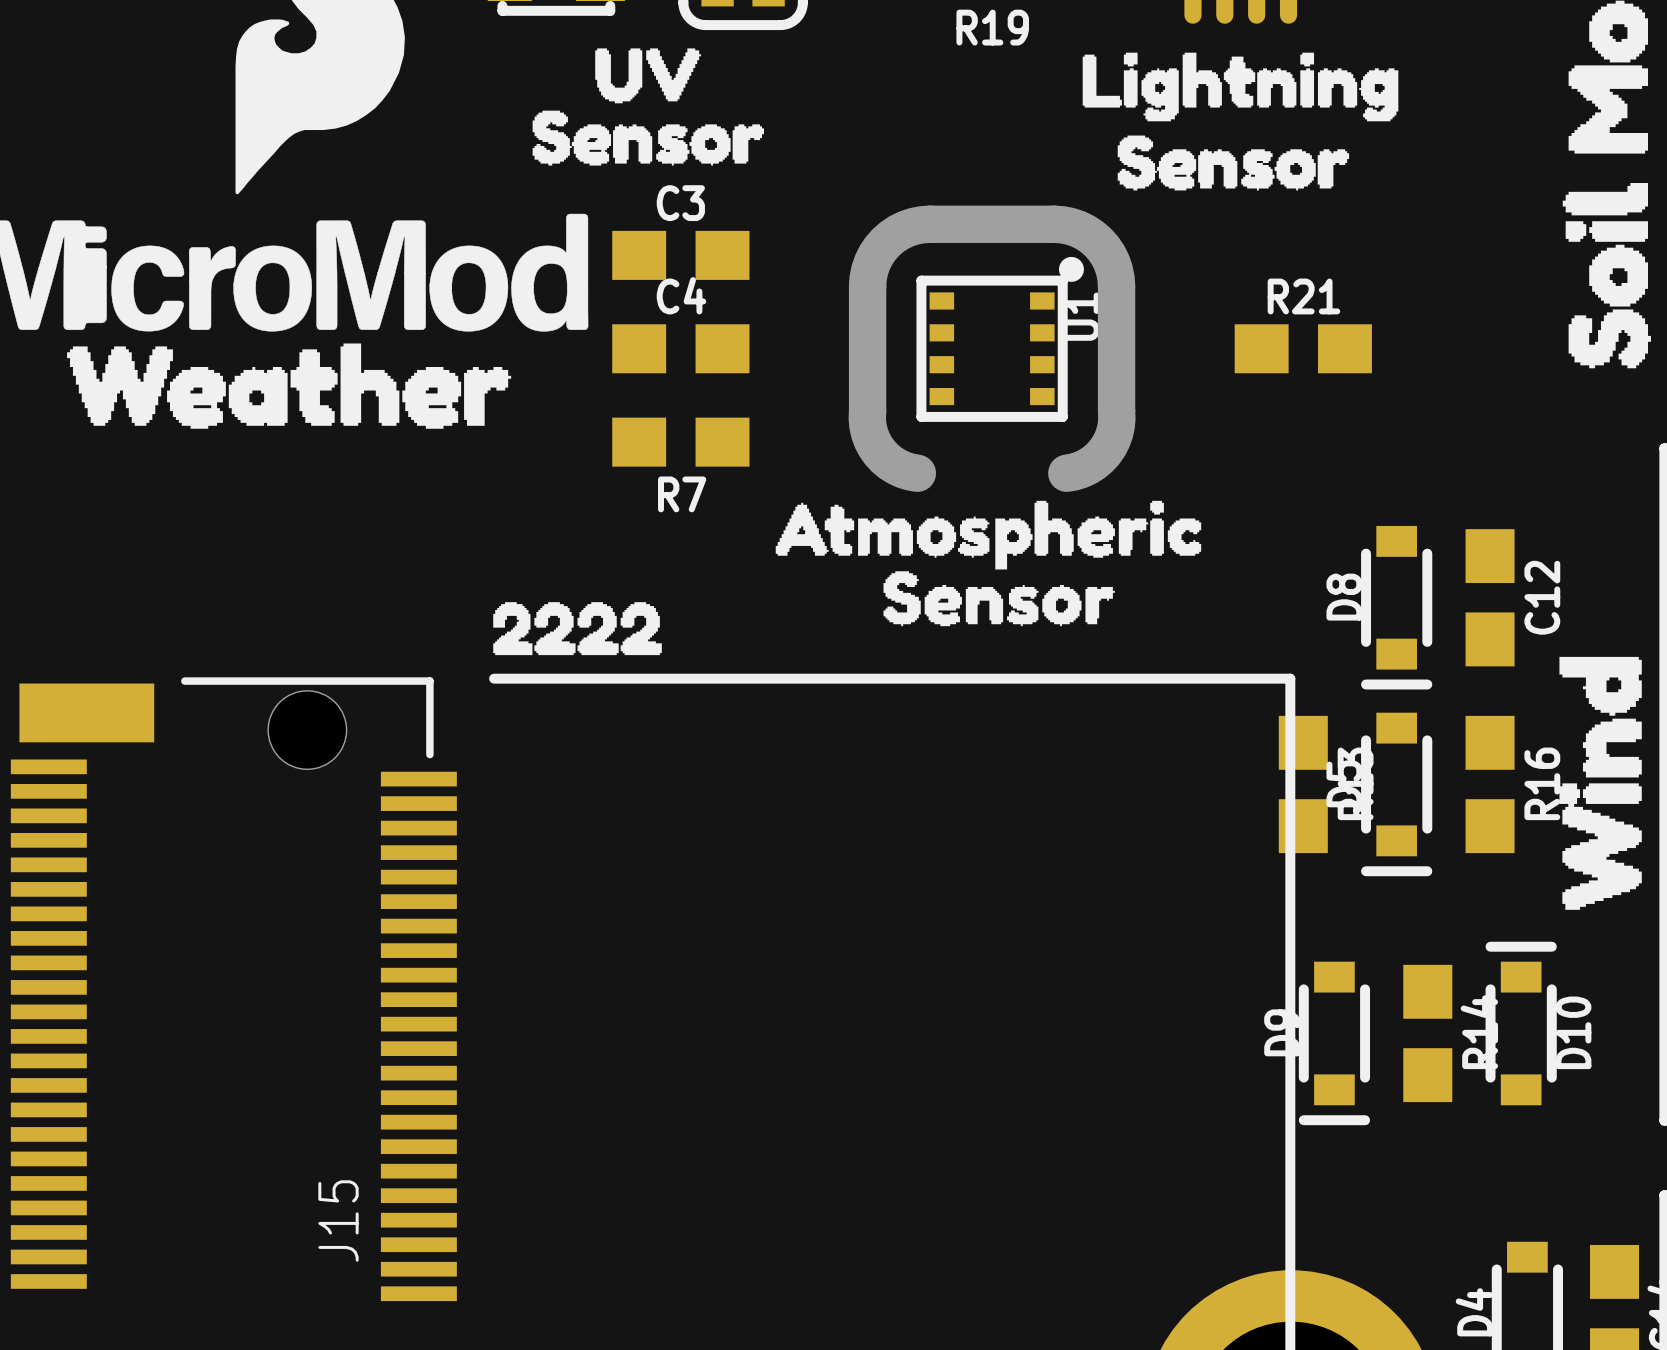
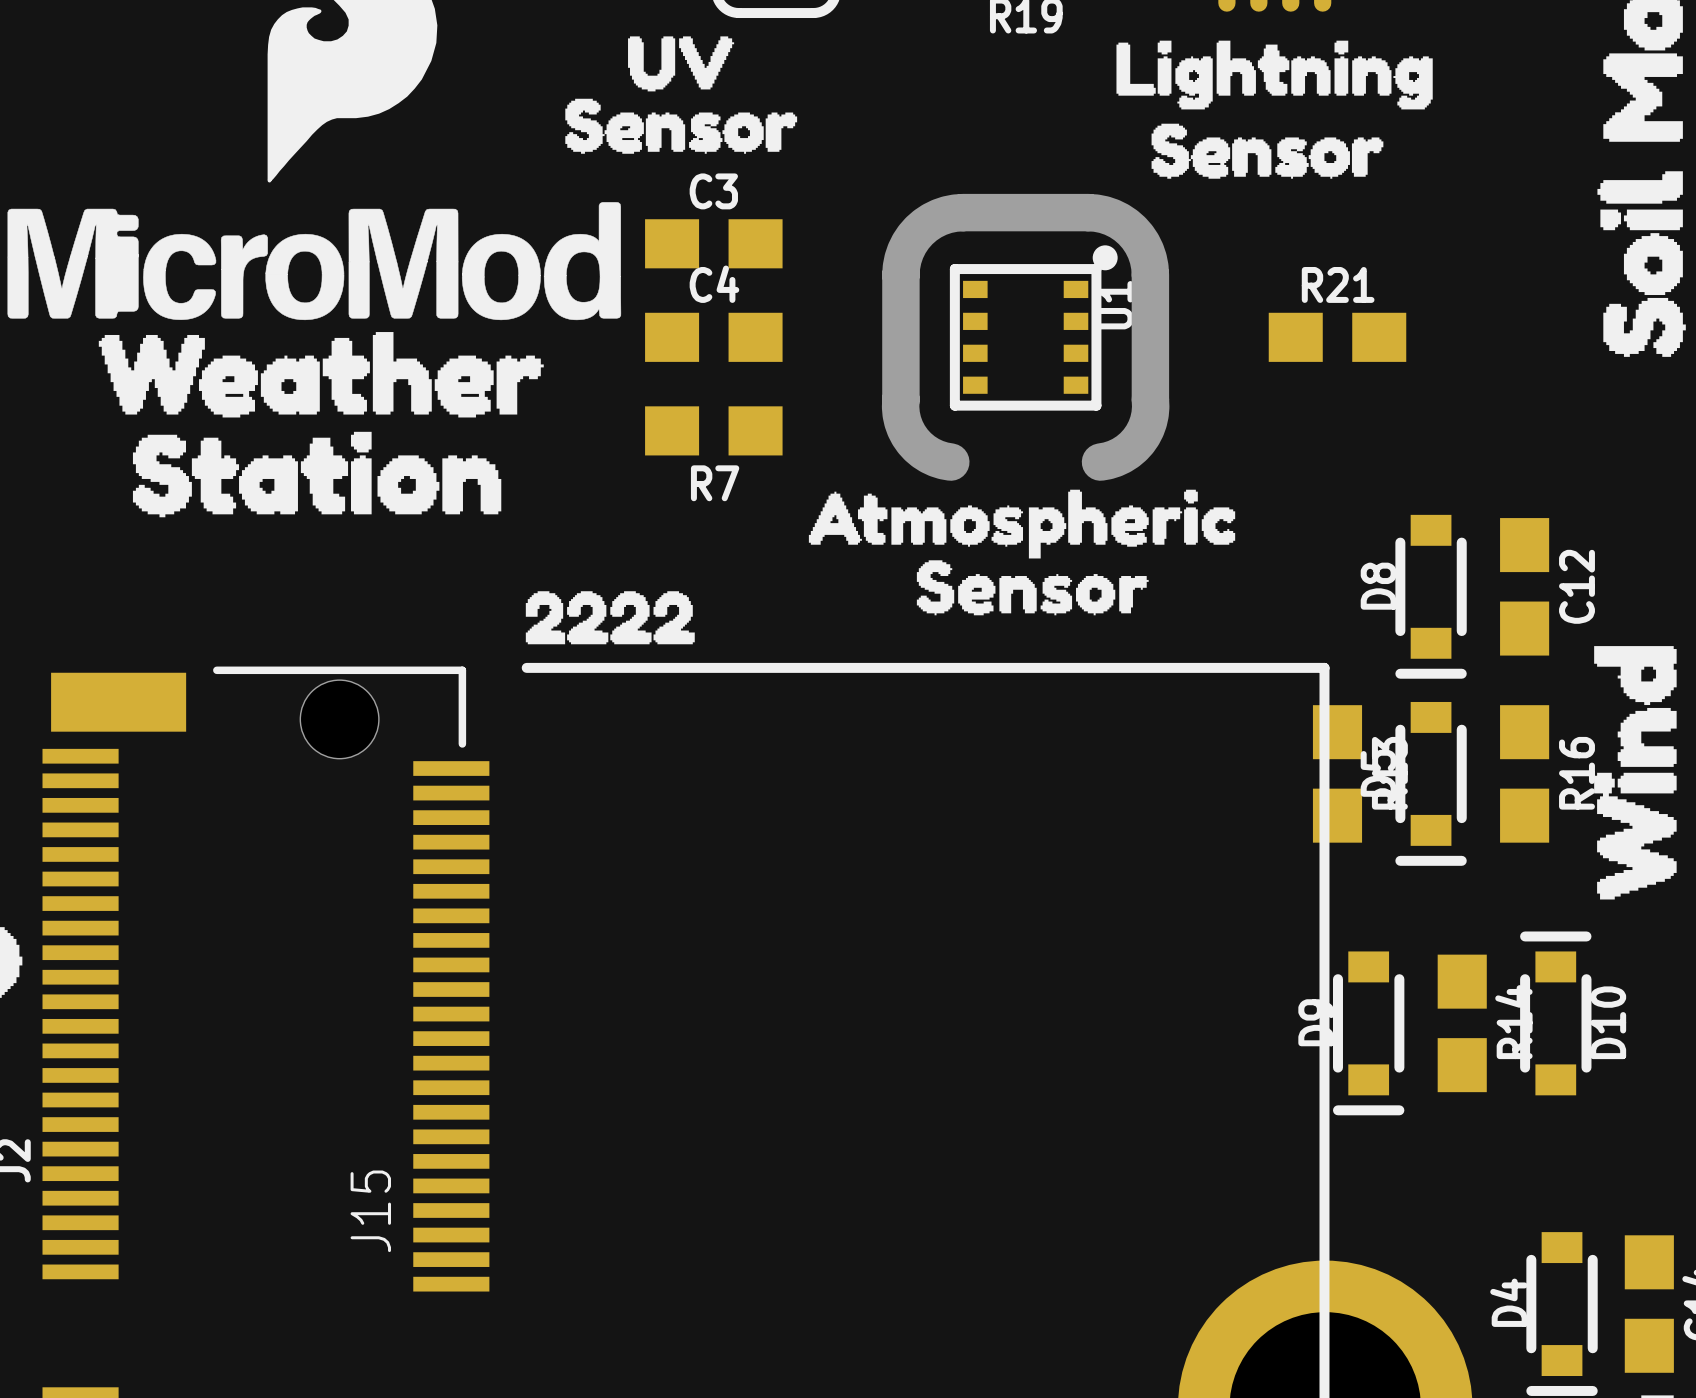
drawing: none -> [132, 431, 502, 518]

